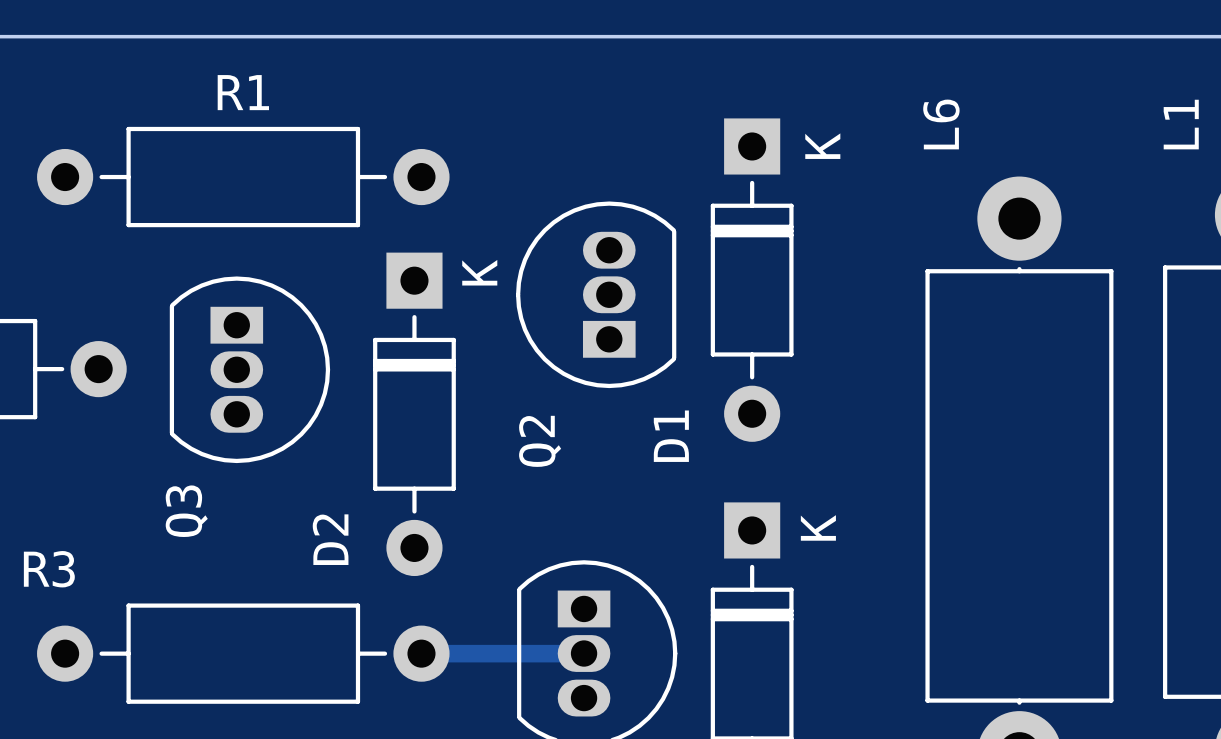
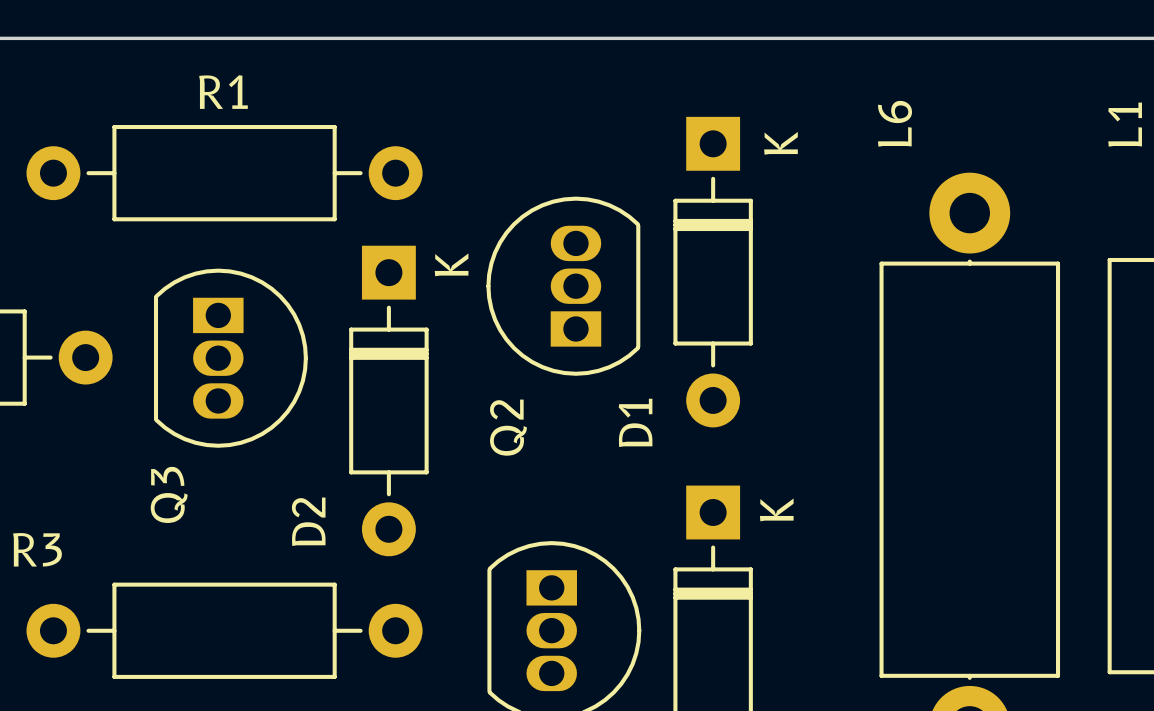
track: (421, 653) (583, 653) -> none

